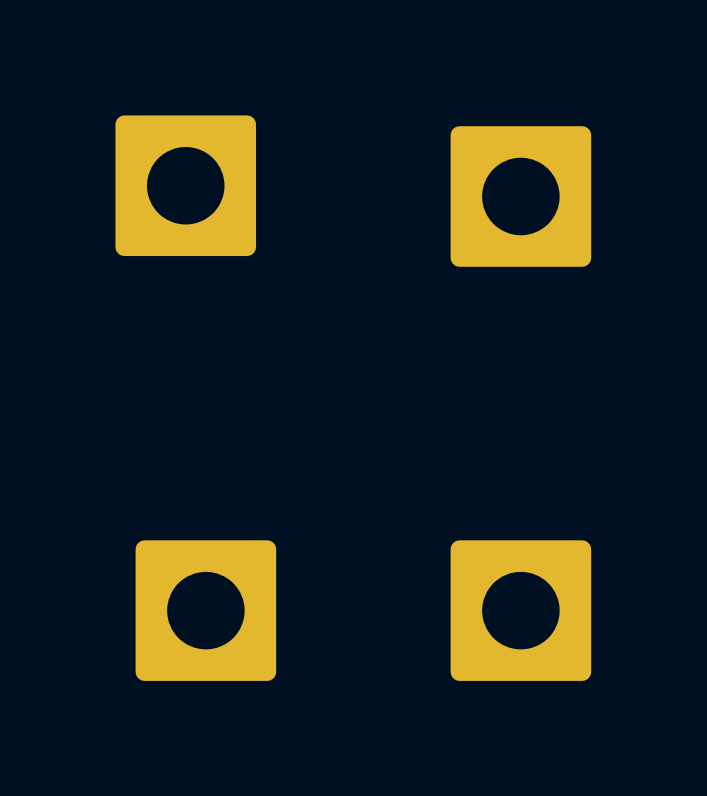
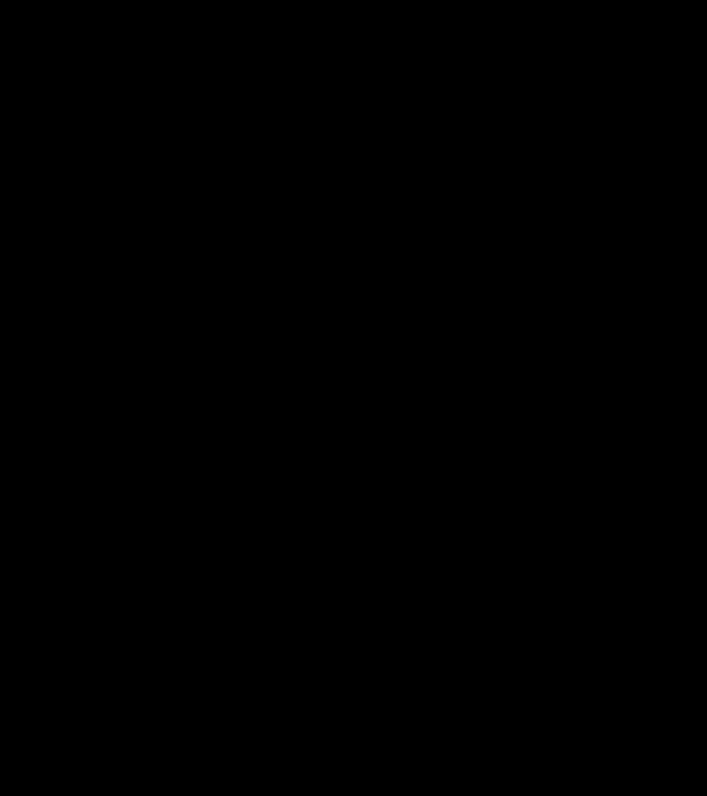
part: (185, 185) -> none
part: (520, 196) -> none
part: (205, 610) -> none
part: (520, 610) -> none

